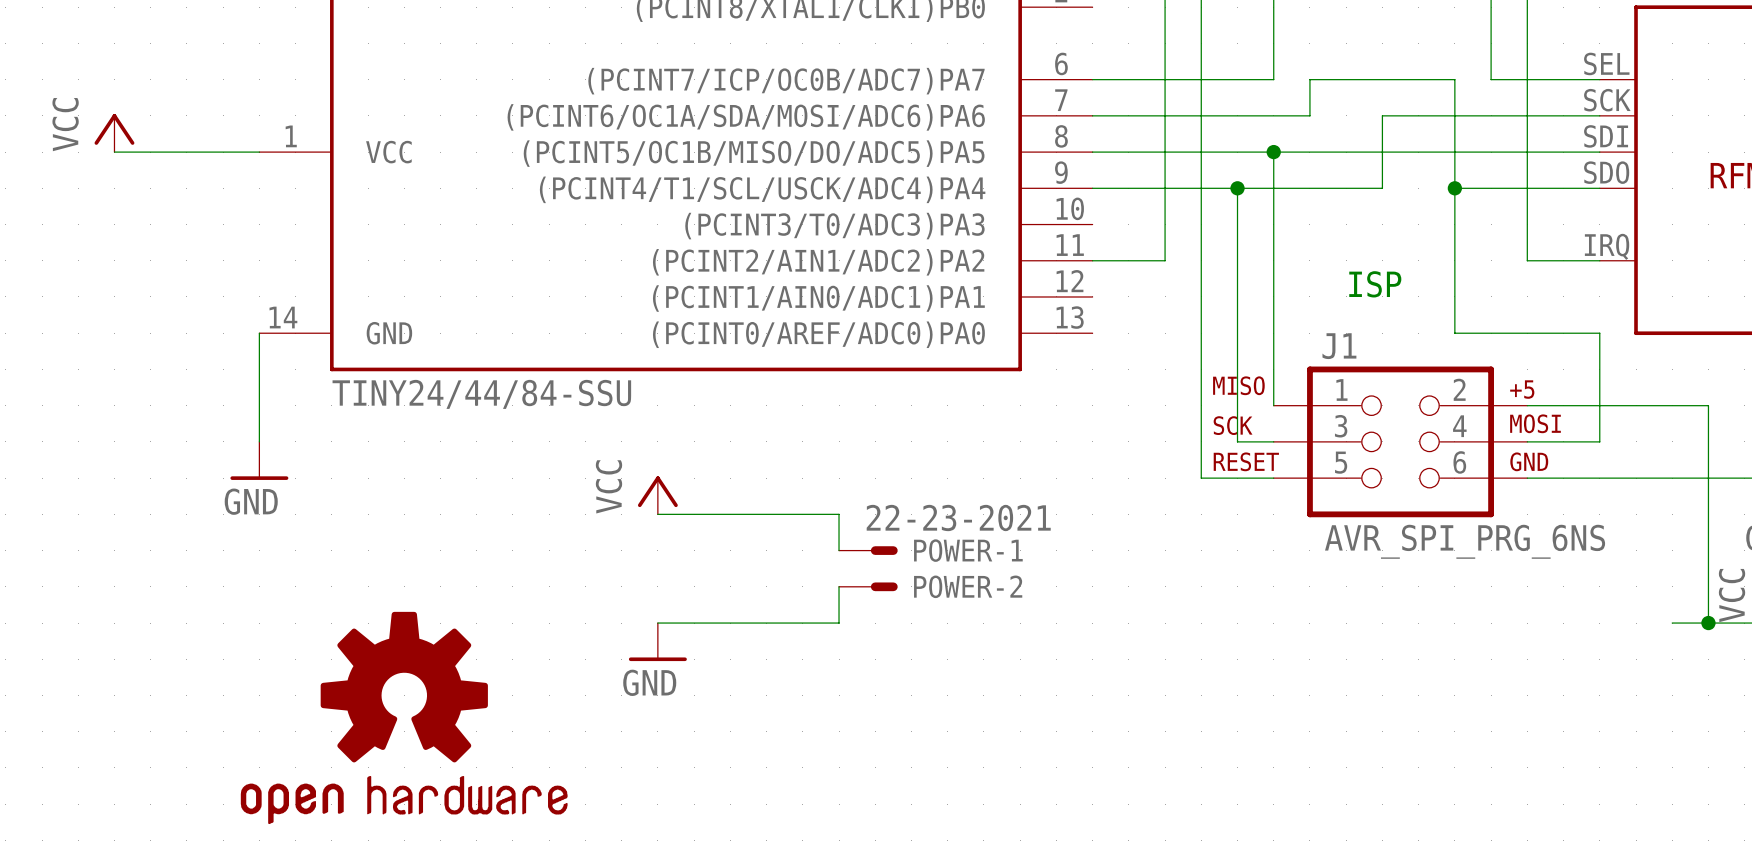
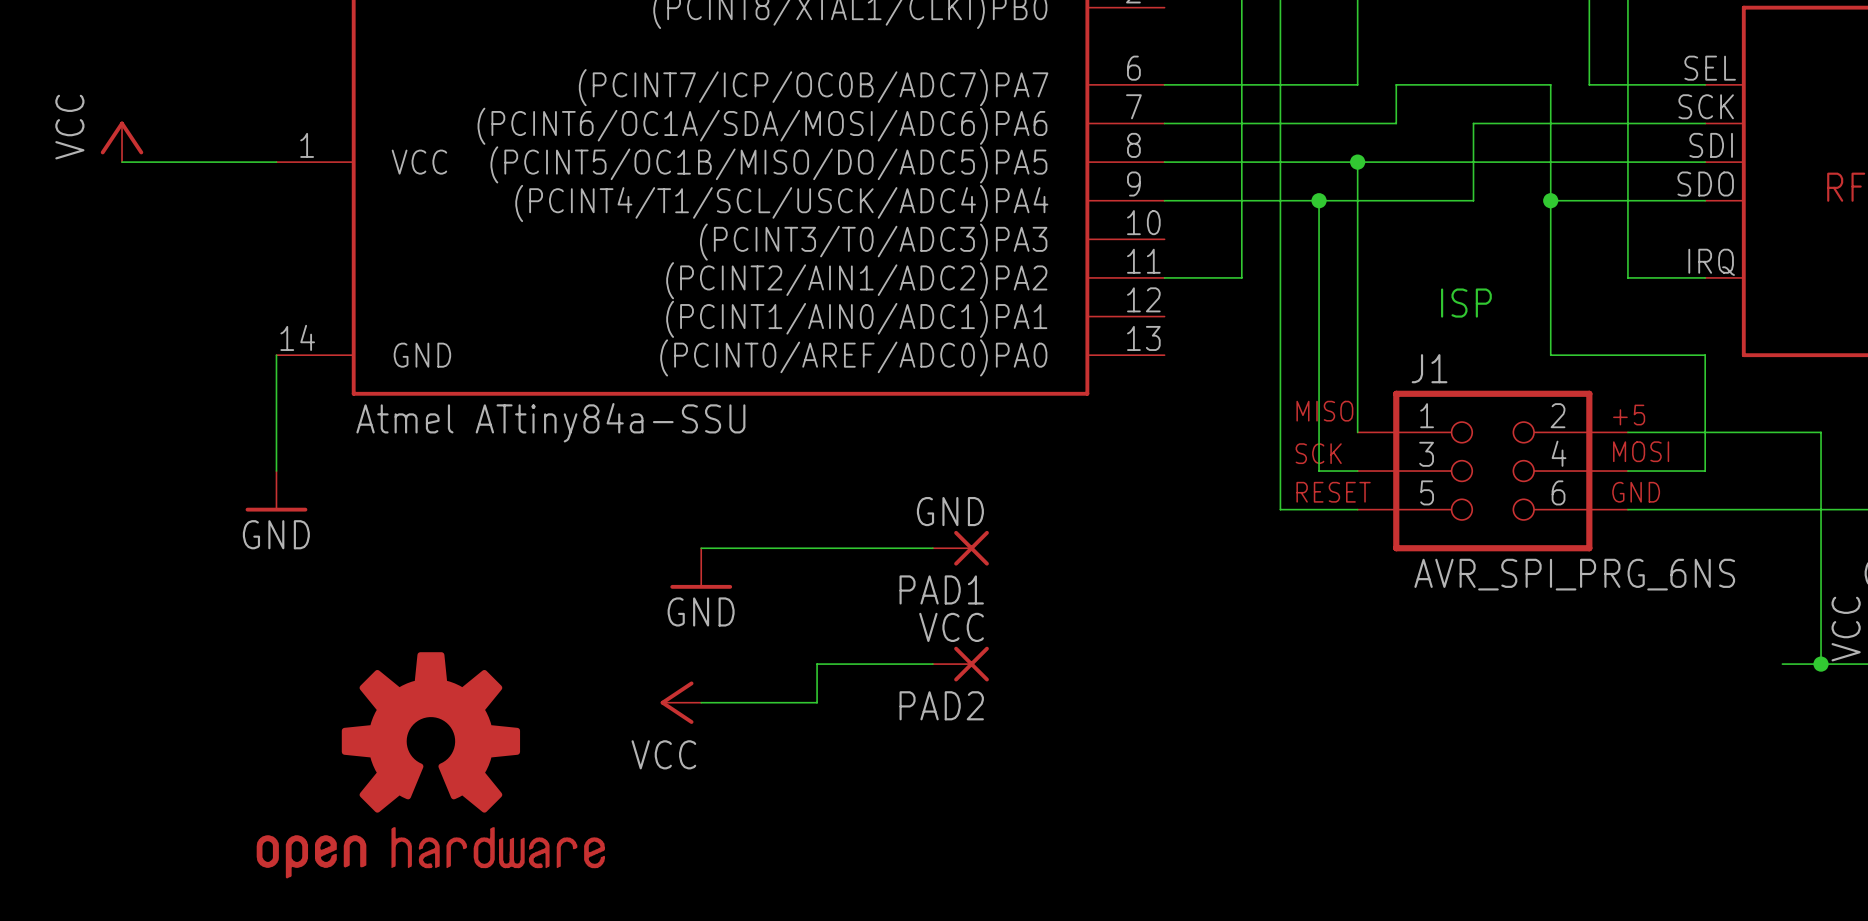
part value: TINY24/44/84-SSU (481, 394) -> Atmel ATtiny84a-SSU (550, 422)
power symbol rotation: 0° (657, 491) -> 90° counterclockwise (677, 702)
power symbol position: VCC (657, 495) -> VCC (680, 702)
wire: (839, 514) (839, 550) -> (894, 548) (932, 548)
PAD1: none -> GND (960, 548)
POWER-1: 22-23-2021 (868, 550) -> none
wire: (839, 586) (839, 623) -> (932, 664) (894, 664)
POWER-2: (868, 586) -> none
wire: (657, 623) (766, 623) -> (701, 702) (817, 702) (817, 664)
PAD2: none -> VCC (960, 664)
power symbol position: GND (657, 642) -> GND (701, 568)

